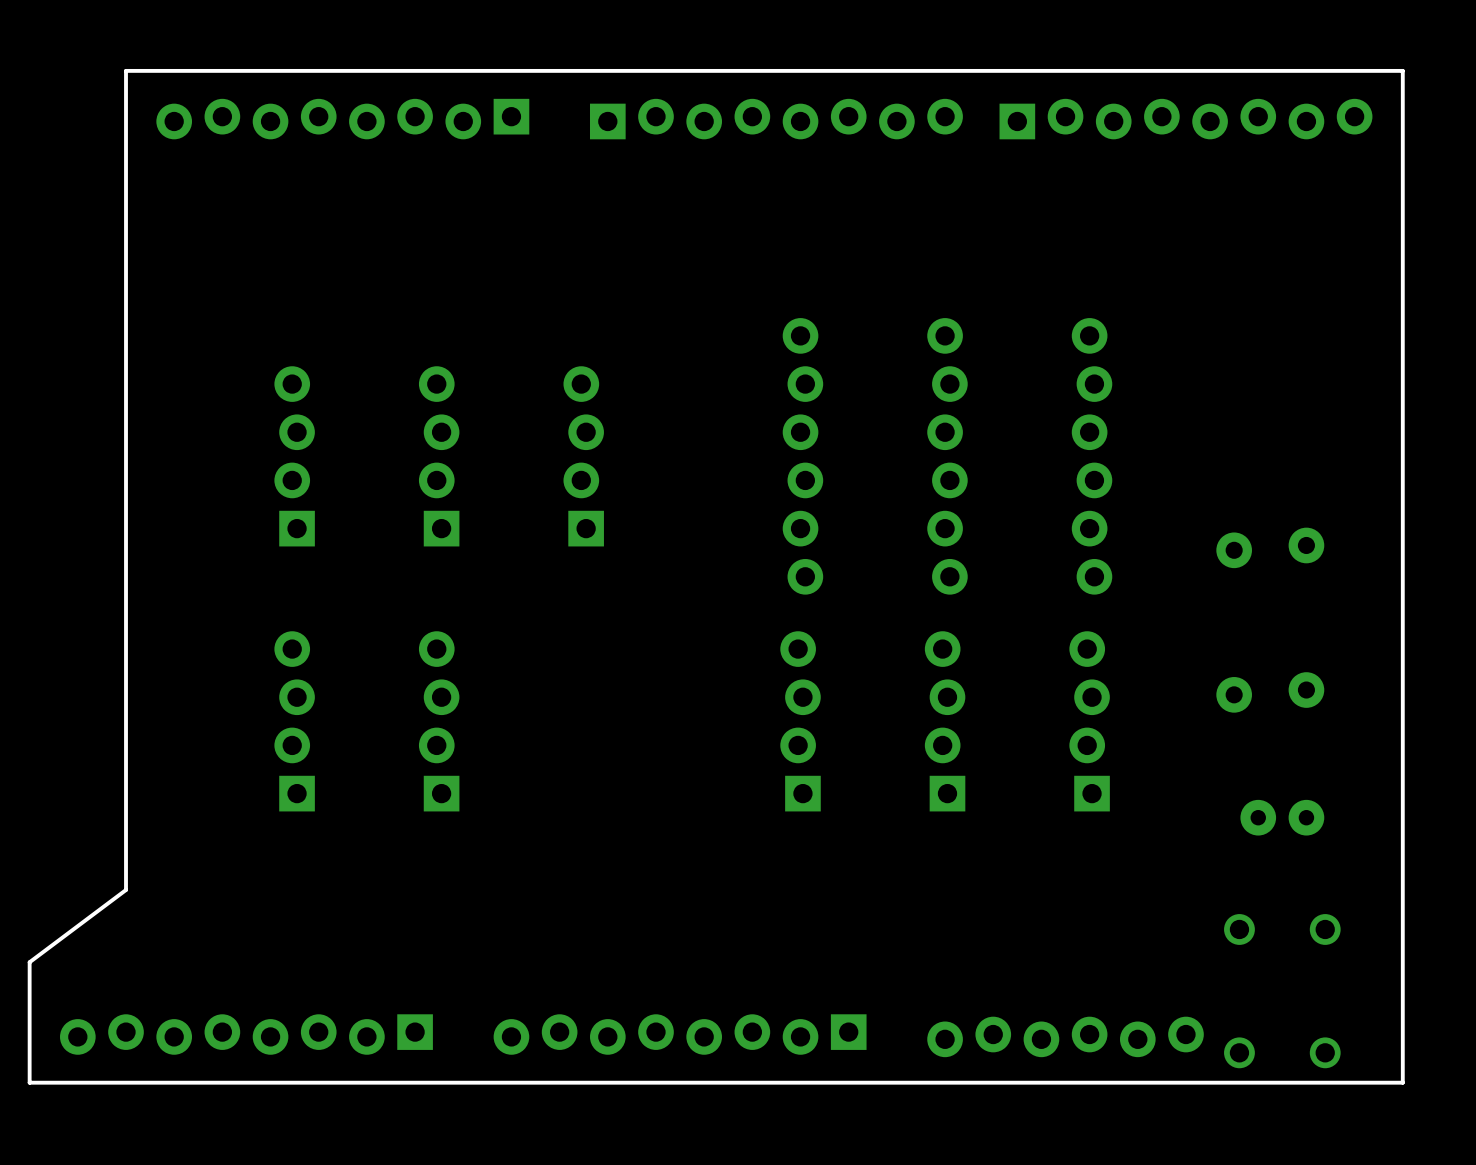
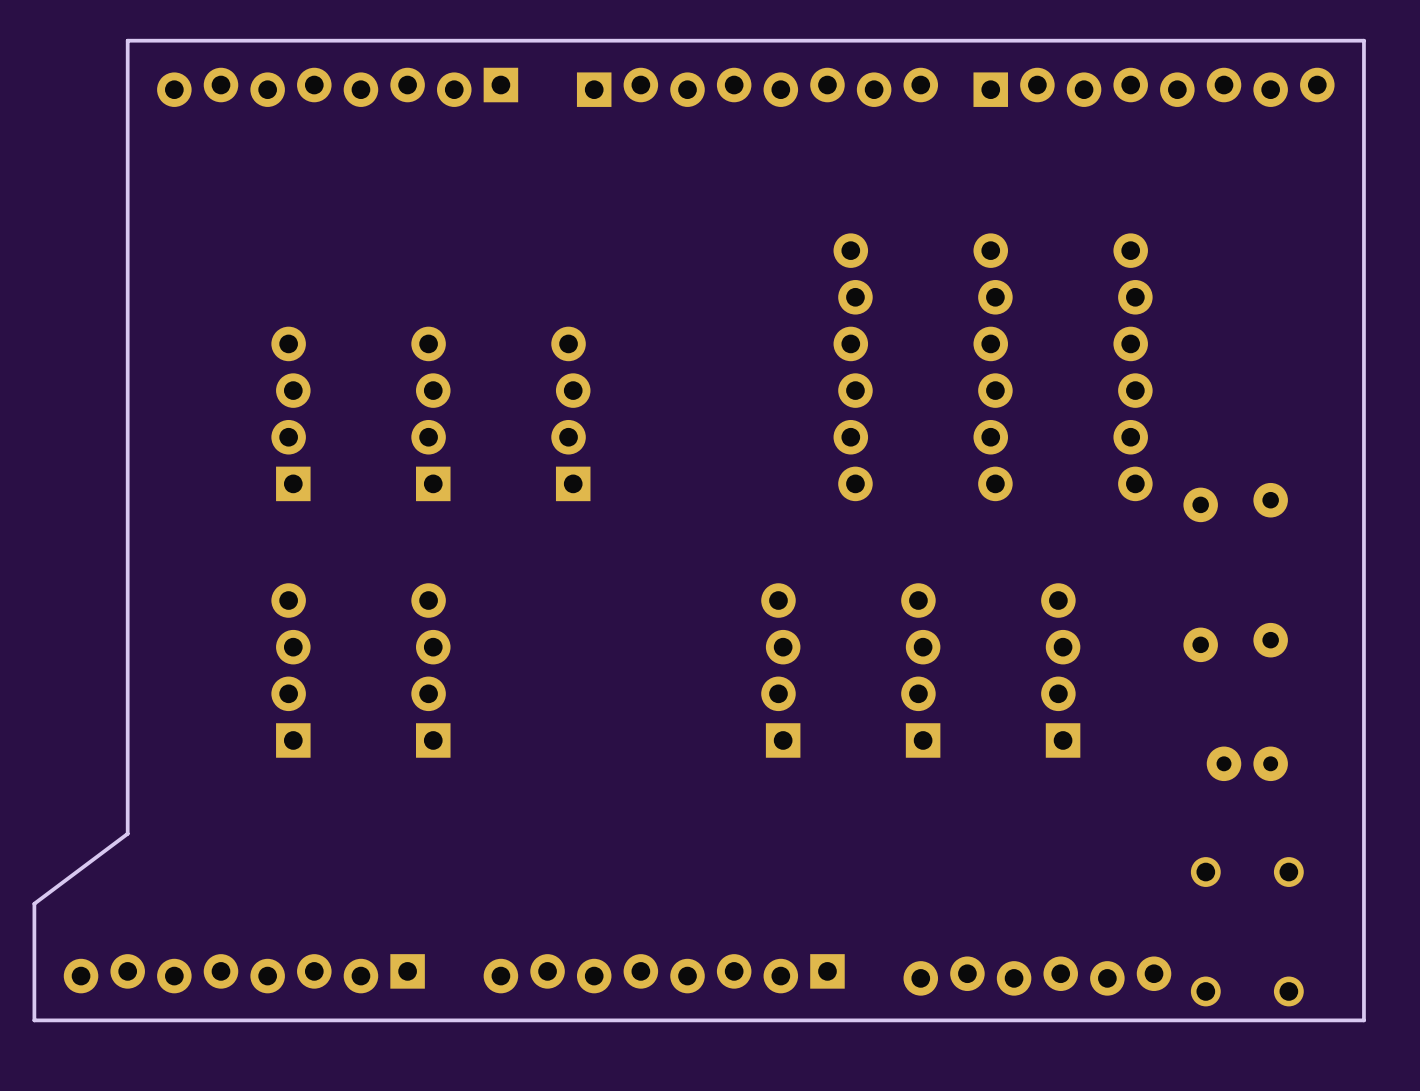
part: none -> (853, 367)
part: none -> (993, 367)
part: none -> (1133, 367)
part: (802, 456) -> none
part: (947, 456) -> none
part: (1092, 456) -> none

